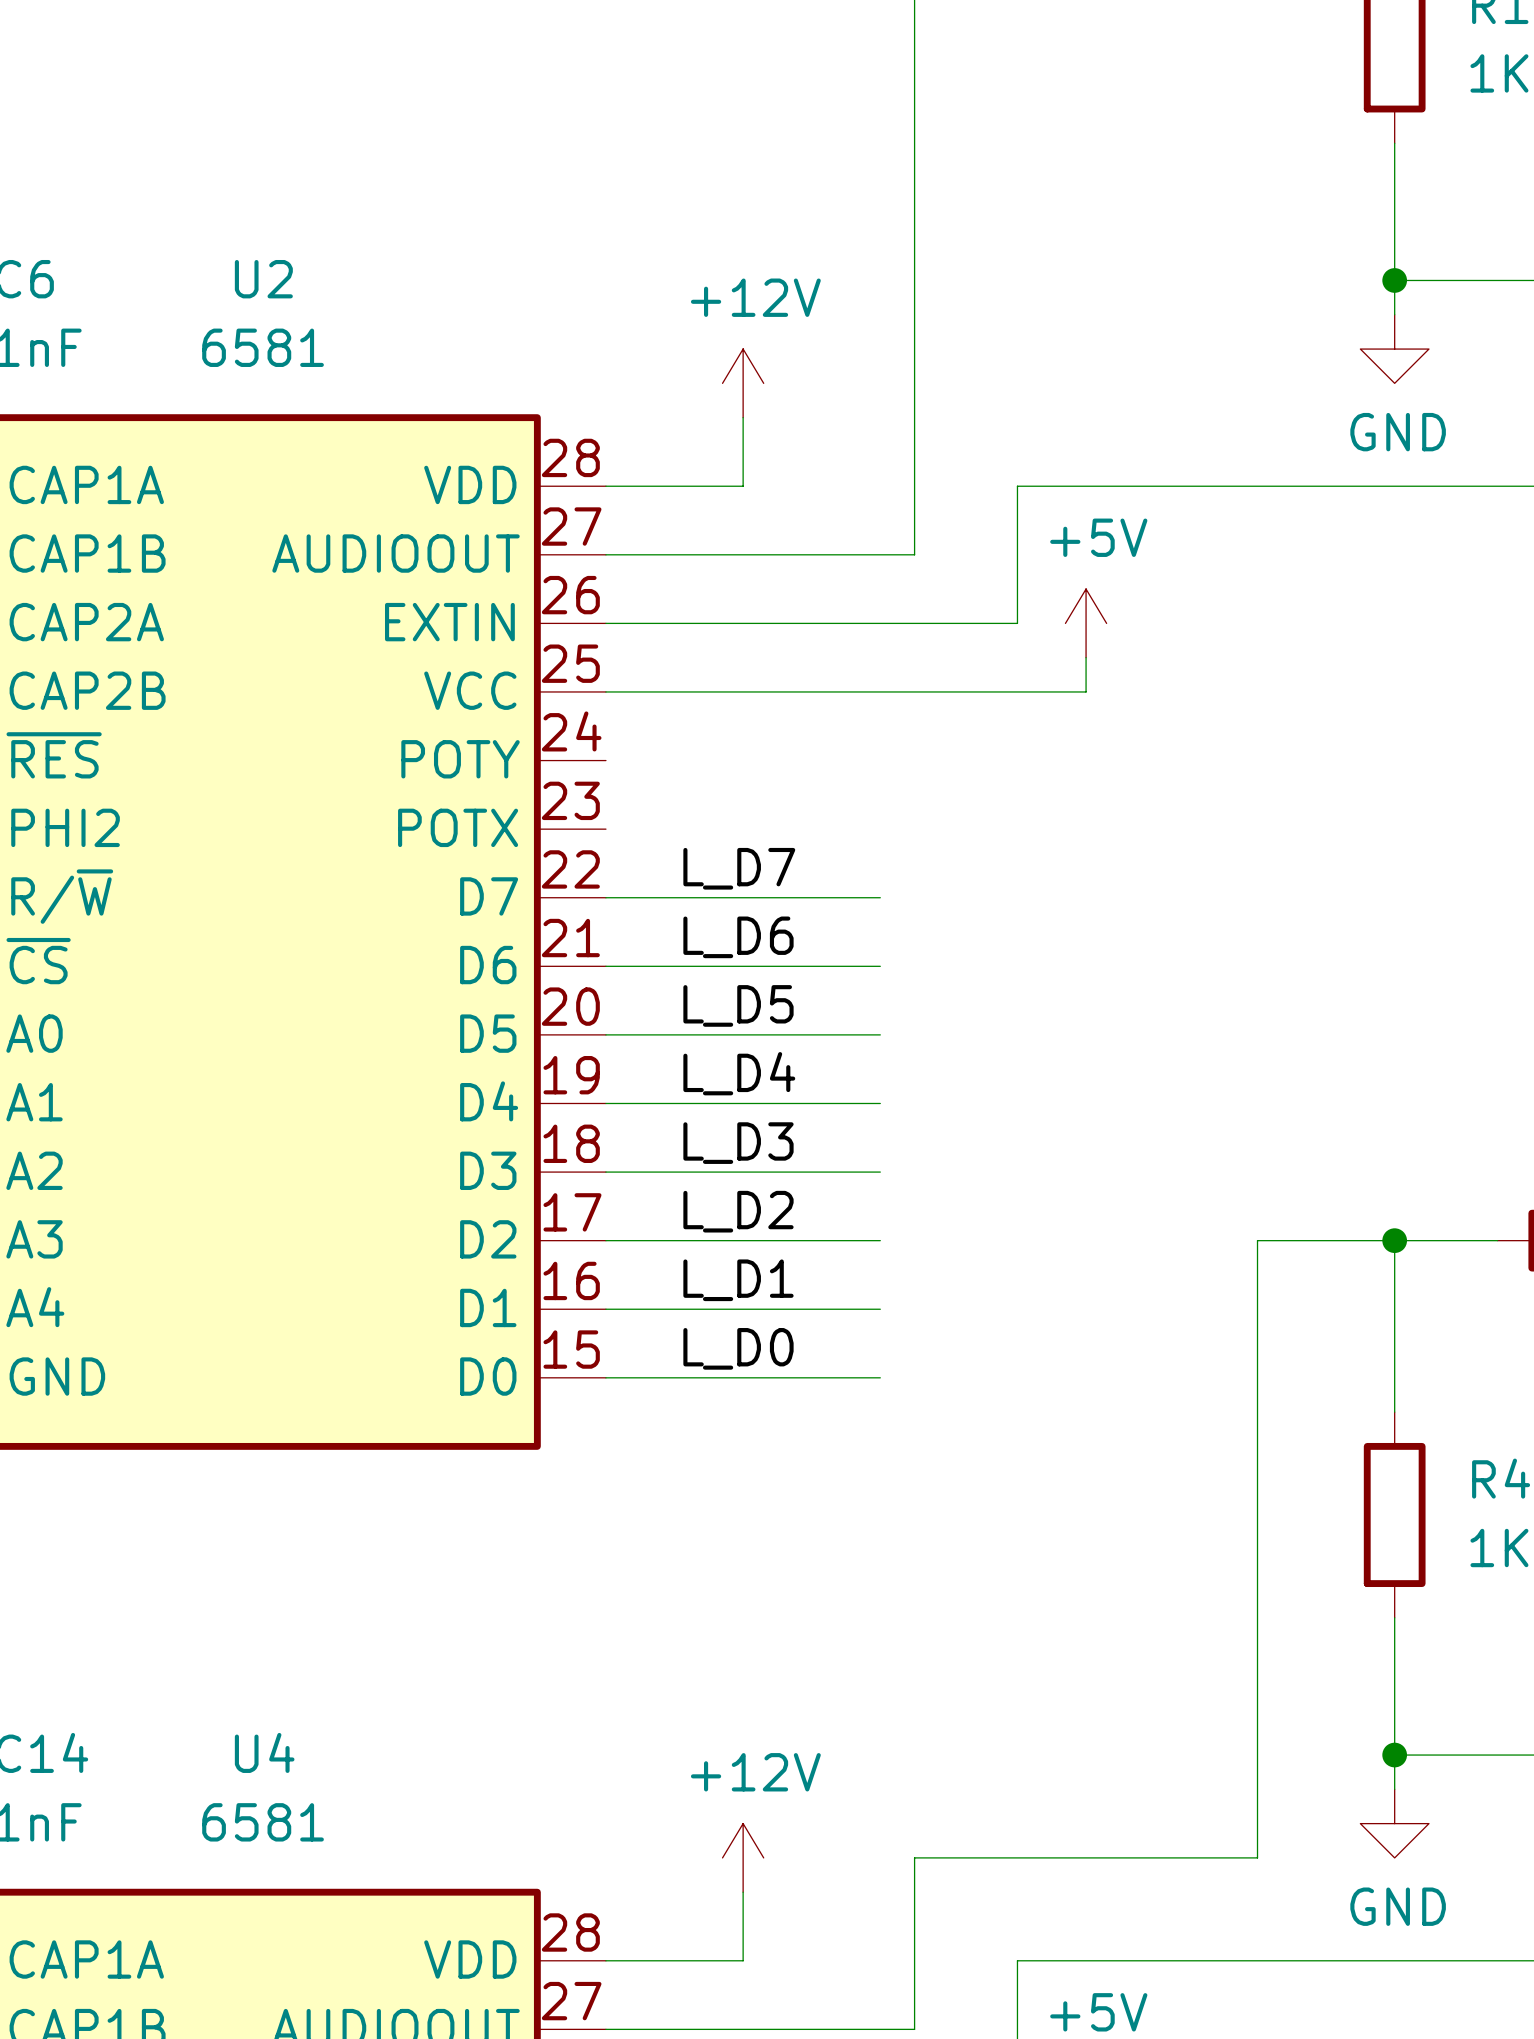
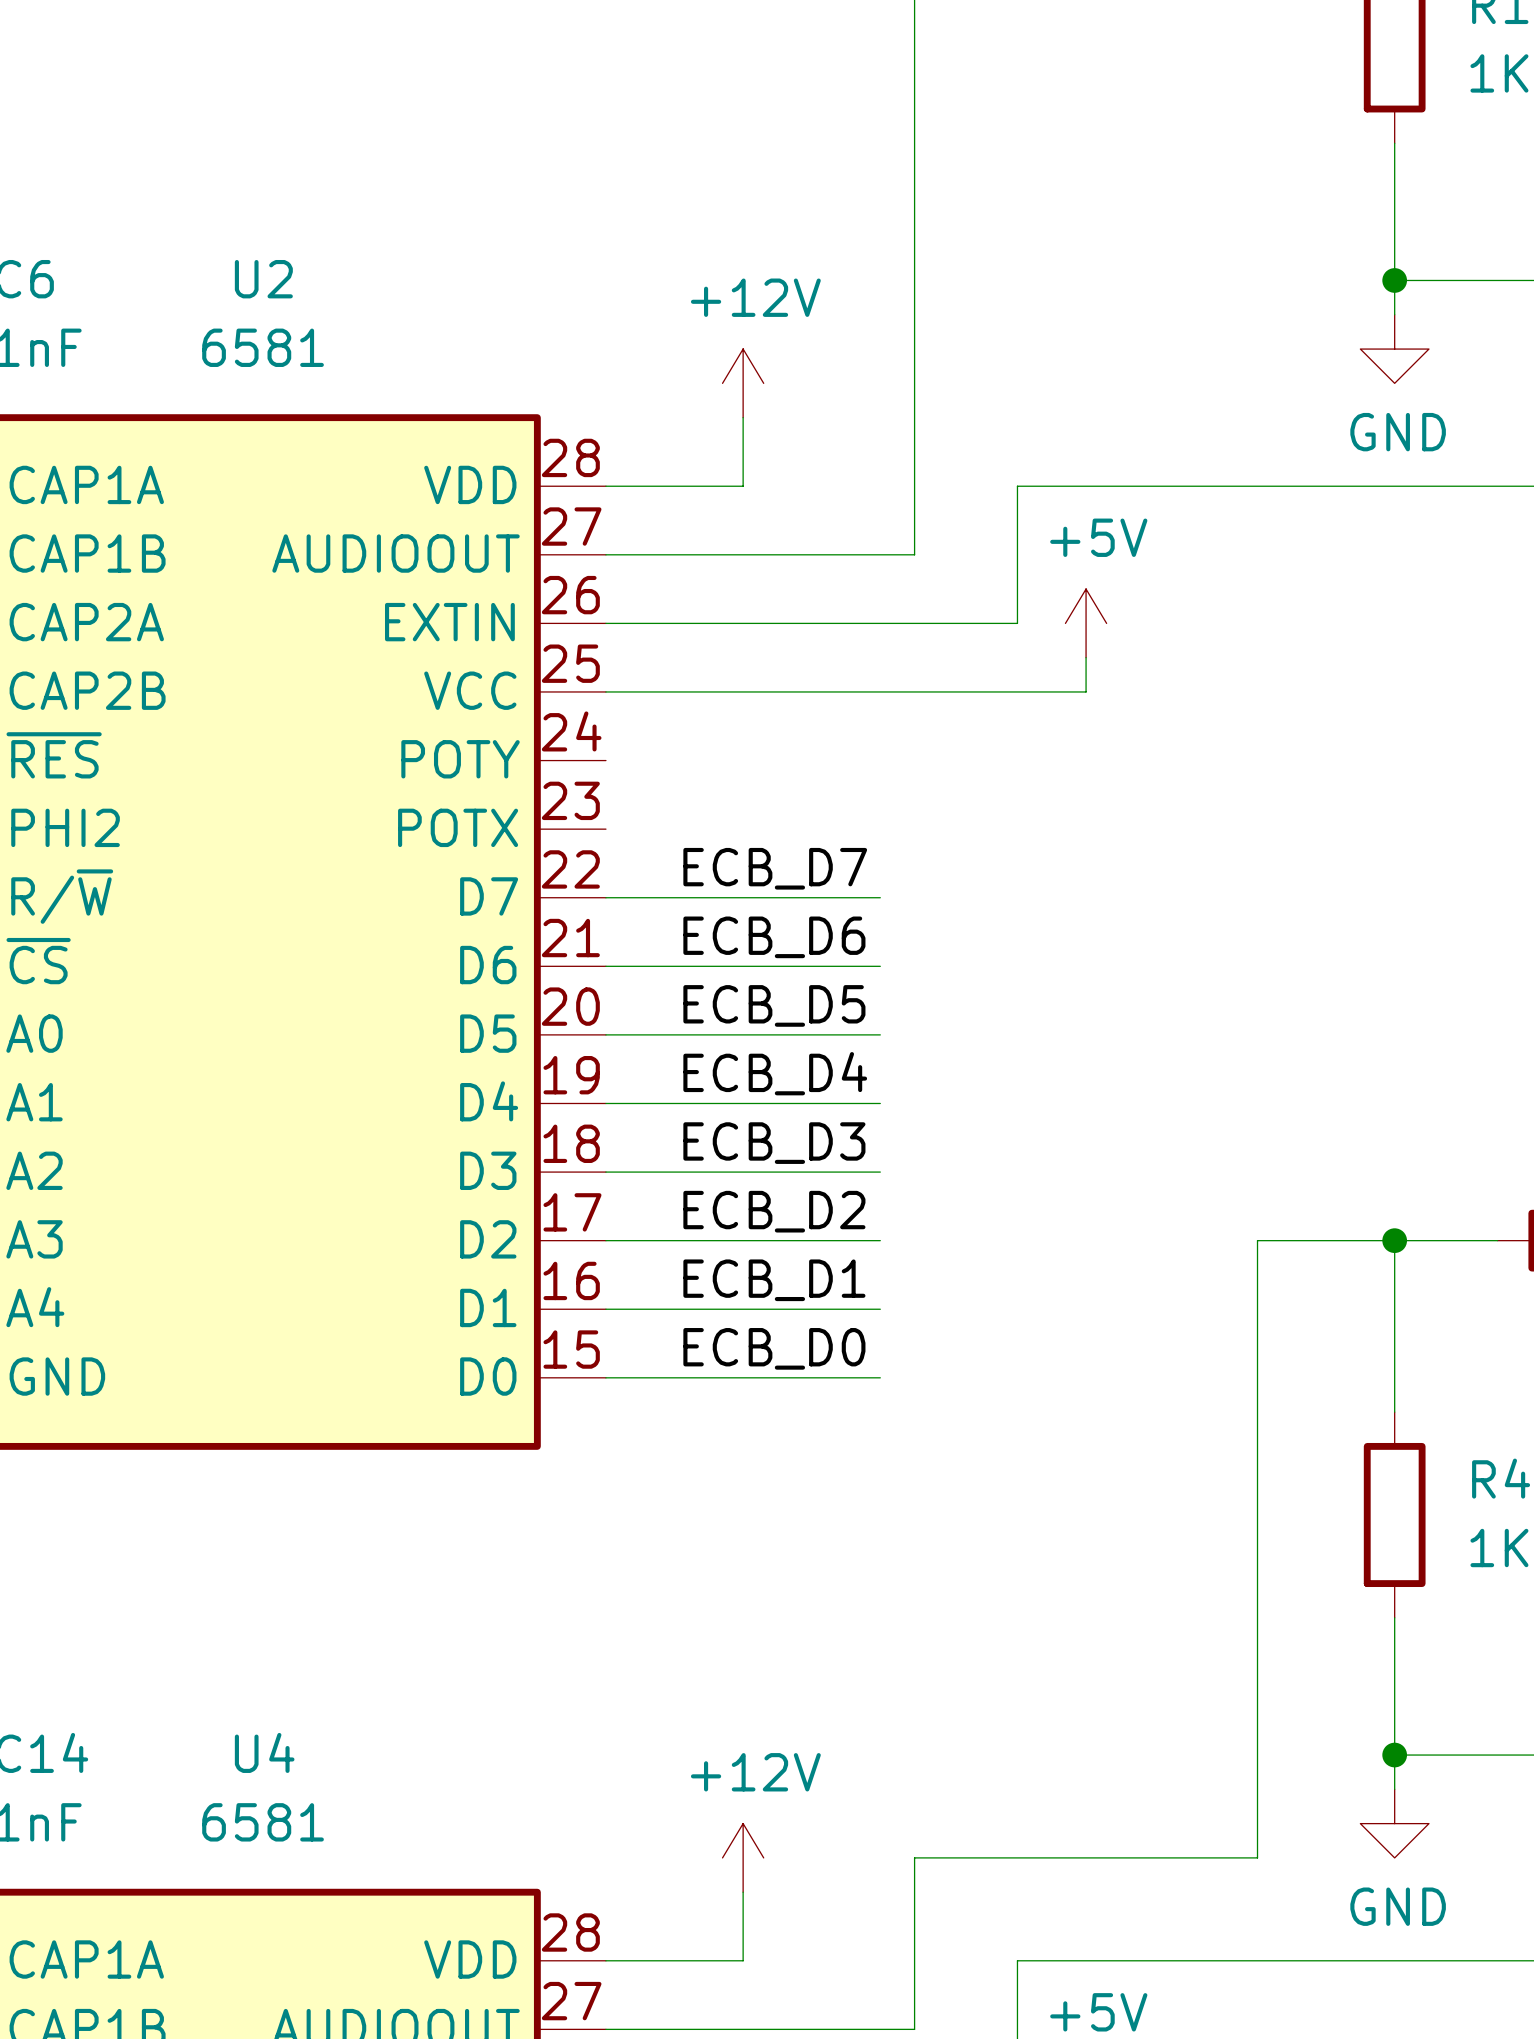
label: L_D7 (739, 868) -> ECB_D7 (775, 868)
label: L_D6 (738, 937) -> ECB_D6 (774, 937)
label: L_D5 (738, 1005) -> ECB_D5 (774, 1005)
label: L_D4 (739, 1073) -> ECB_D4 (775, 1073)
label: L_D3 (738, 1143) -> ECB_D3 (774, 1143)
label: L_D2 (738, 1211) -> ECB_D2 (774, 1211)
label: L_D1 (738, 1280) -> ECB_D1 (774, 1280)
label: L_D0 (738, 1348) -> ECB_D0 (774, 1348)

